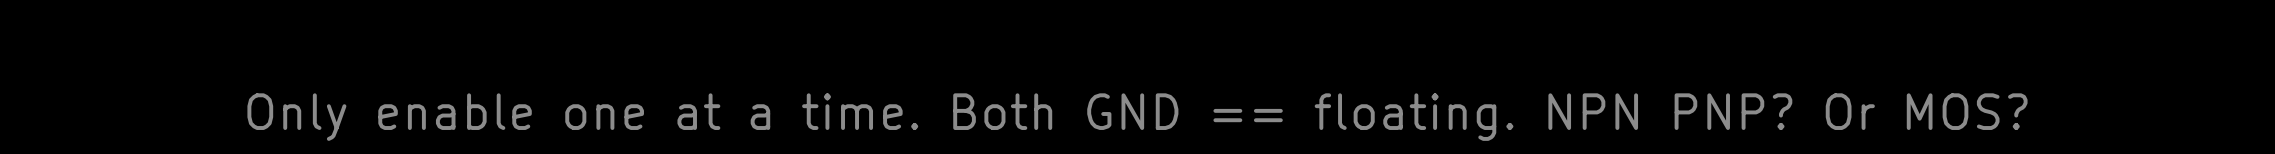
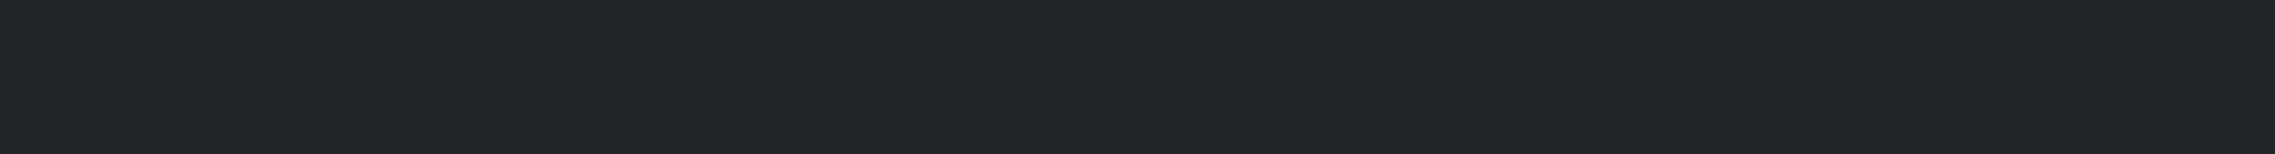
text: Only enable one at a time. Both GND == floating. NPN PNP? Or MOS? (1137, 117) -> none

